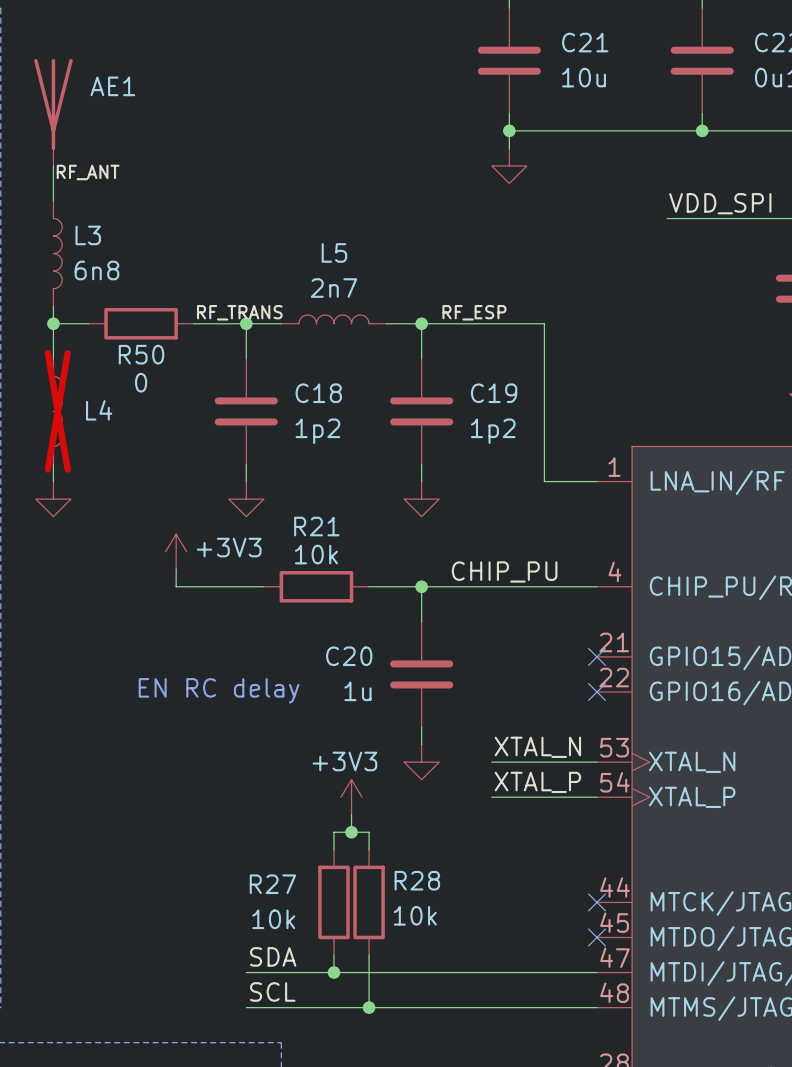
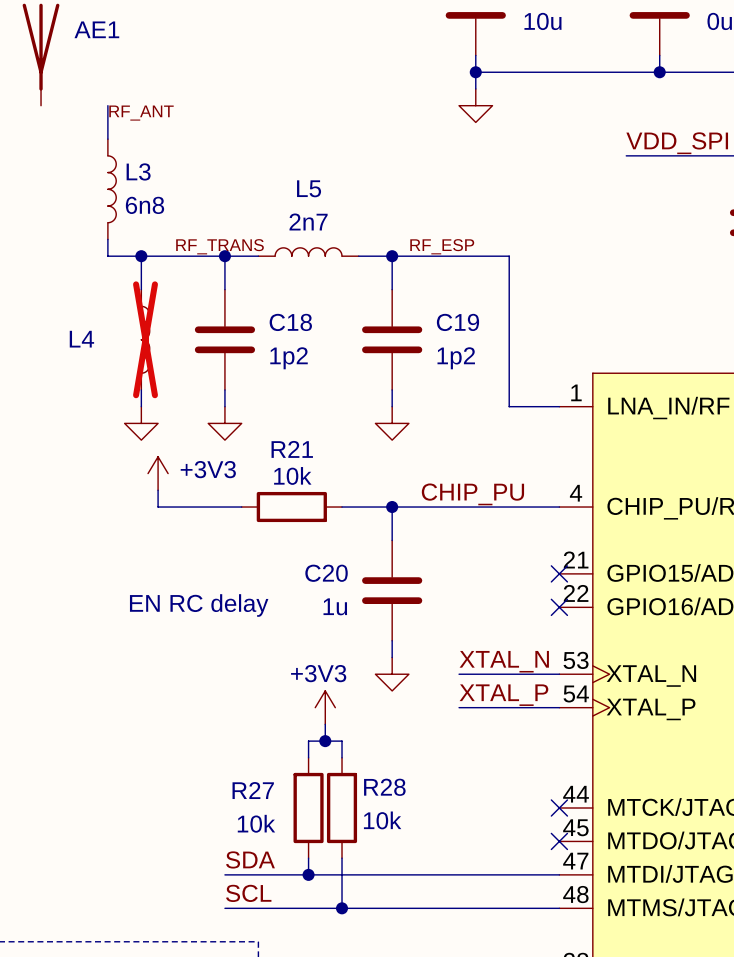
wire: (53, 165) (53, 201) -> (107, 105) (107, 139)
label position: RF_ANT (88, 172) -> RF_ANT (141, 113)
L3 position: (57, 253) -> (112, 189)
wire: (53, 306) (53, 358) -> none
wire: none -> (107, 239) (107, 256) (174, 256)
wire: (53, 323) (88, 323) -> none
junction: (53, 323) -> none
R50: 0 (141, 323) -> none
wire: none -> (141, 256) (141, 289)
junction: none -> (141, 256)
L4 position: (57, 411) -> (145, 339)
wire: (53, 464) (53, 481) -> (141, 389) (141, 406)
power symbol position: (53, 499) -> (141, 423)

